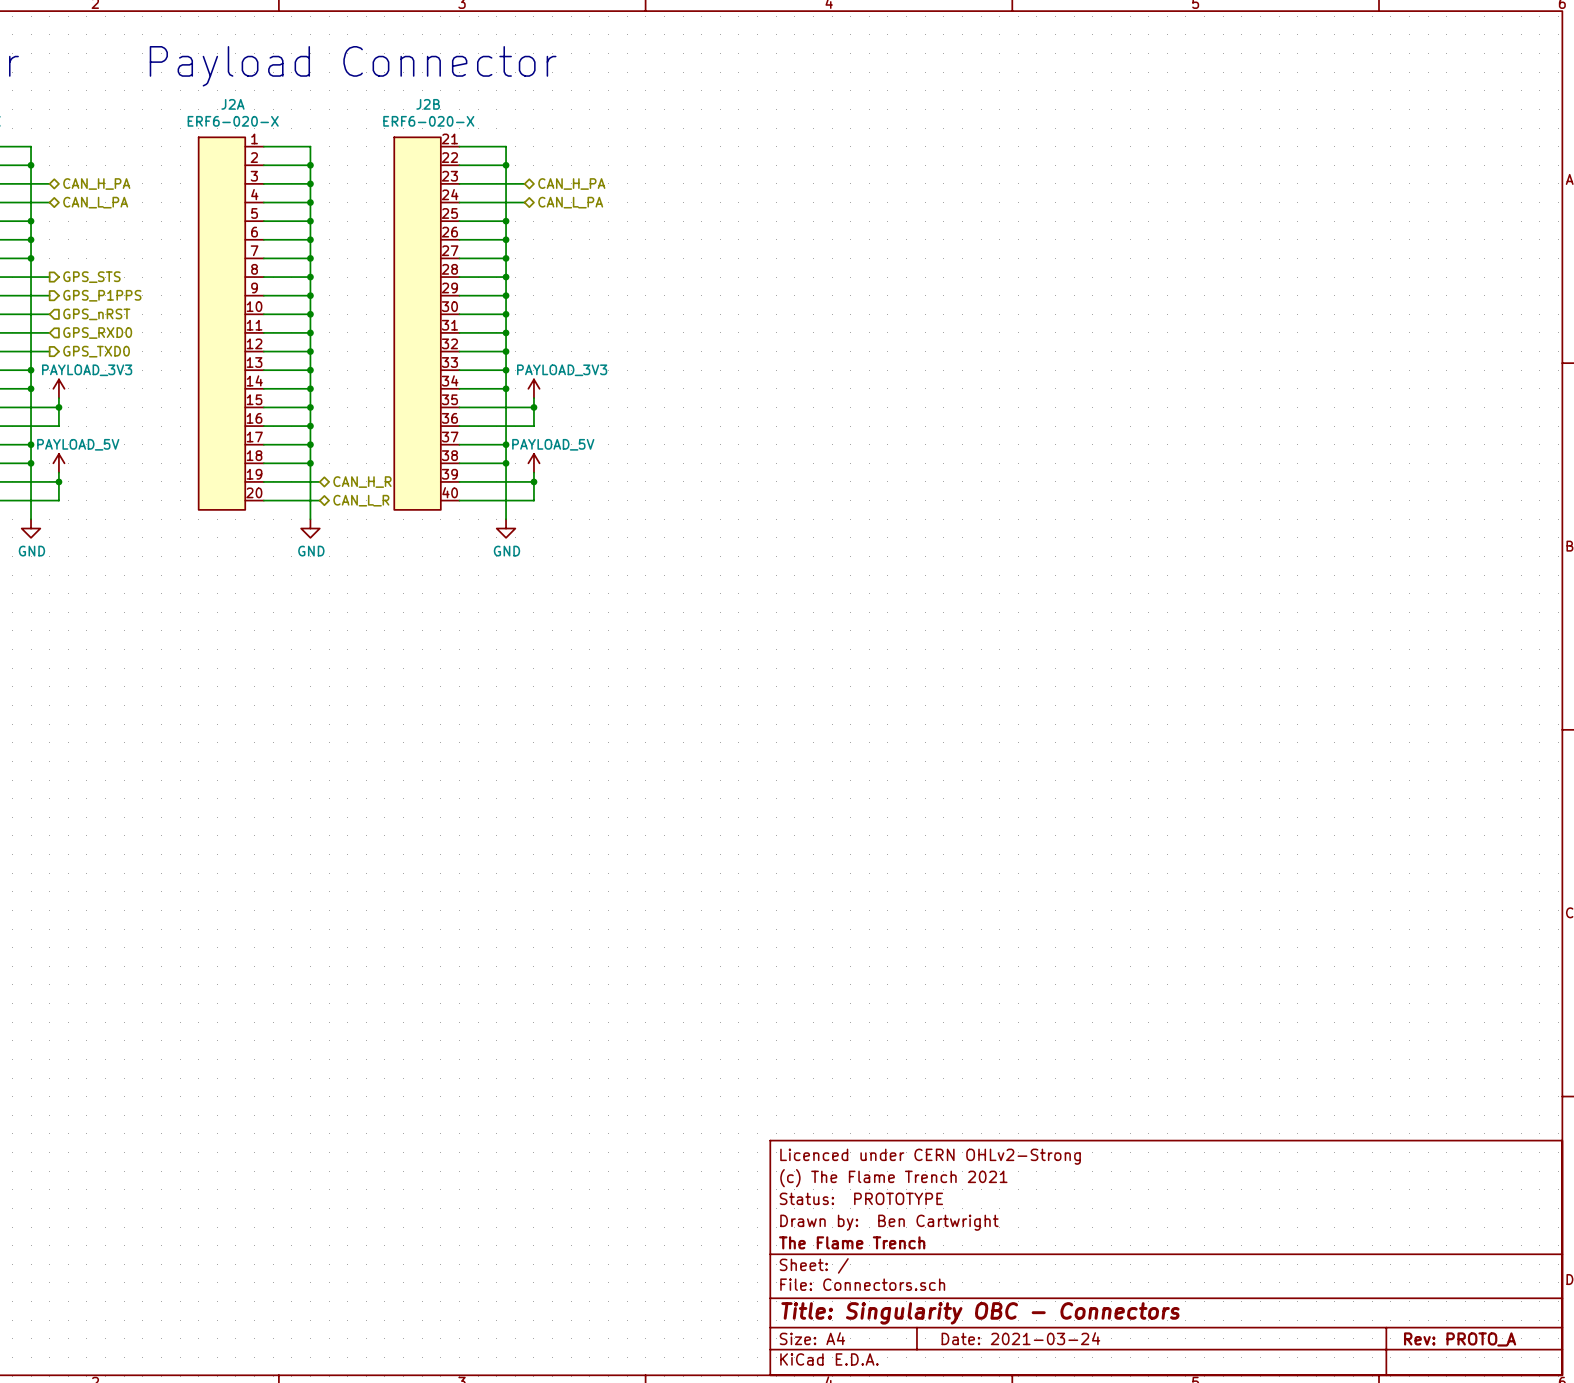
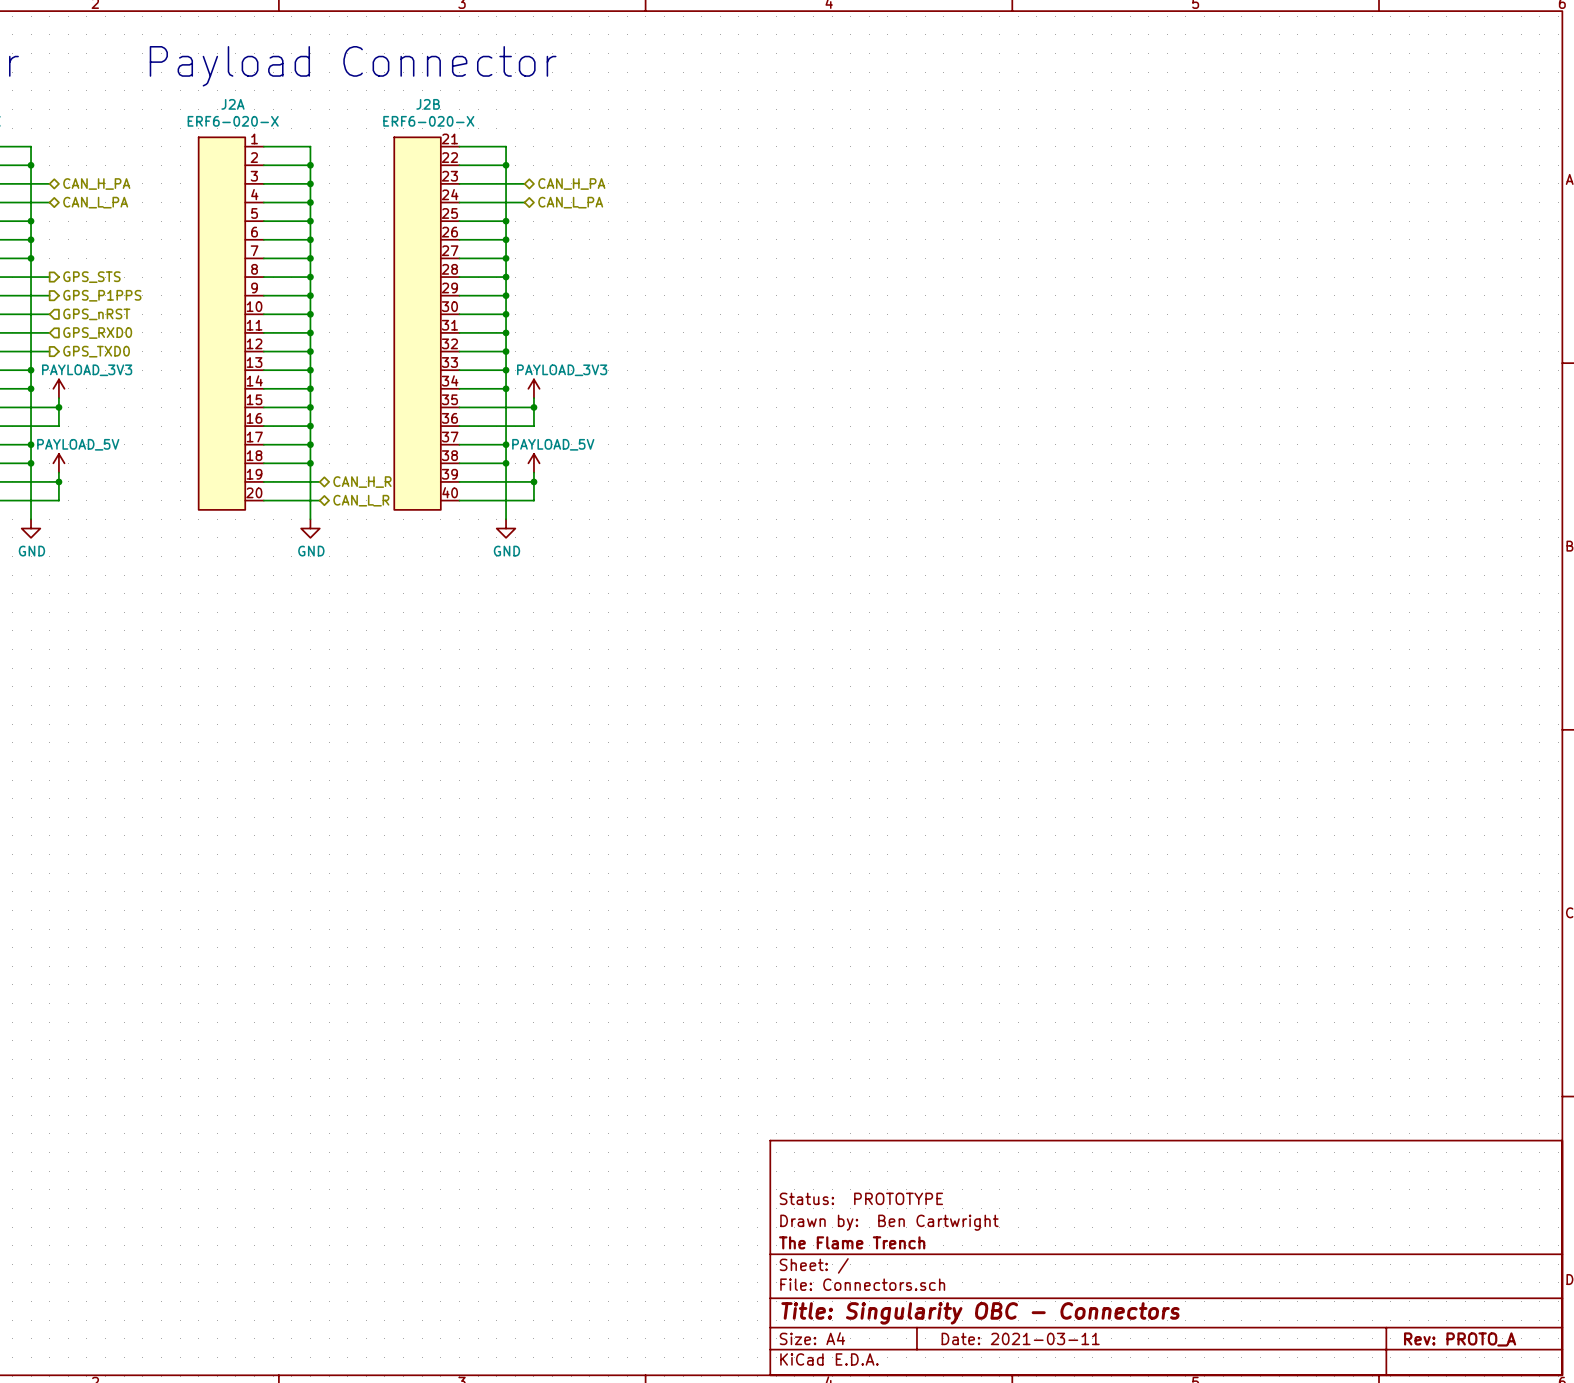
title block: Licenced under CERN OHLv2-Strong (930, 1156) -> none
title block: (c) The Flame Trench 2021 (893, 1178) -> none
title block: Date: 2021-03-24 (1020, 1338) -> Date: 2021-03-11 (1020, 1338)

